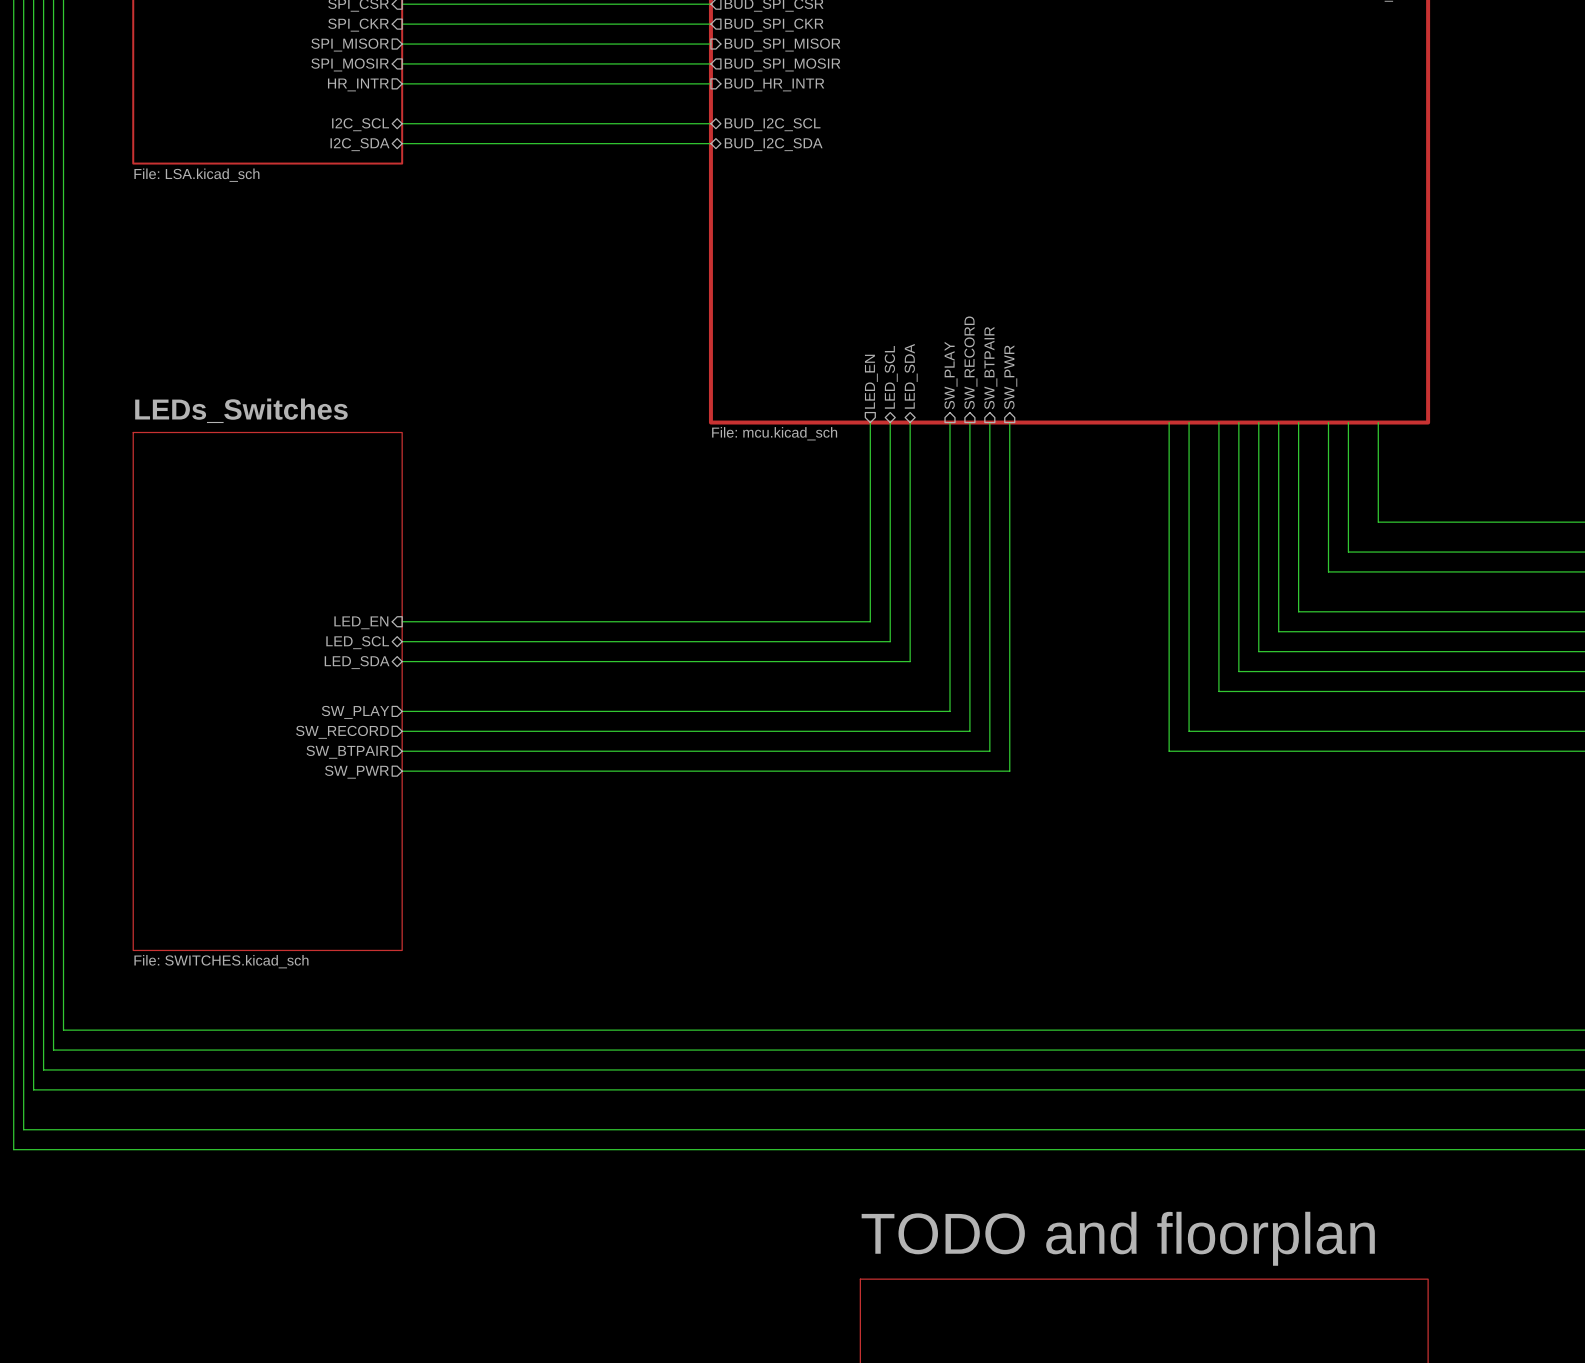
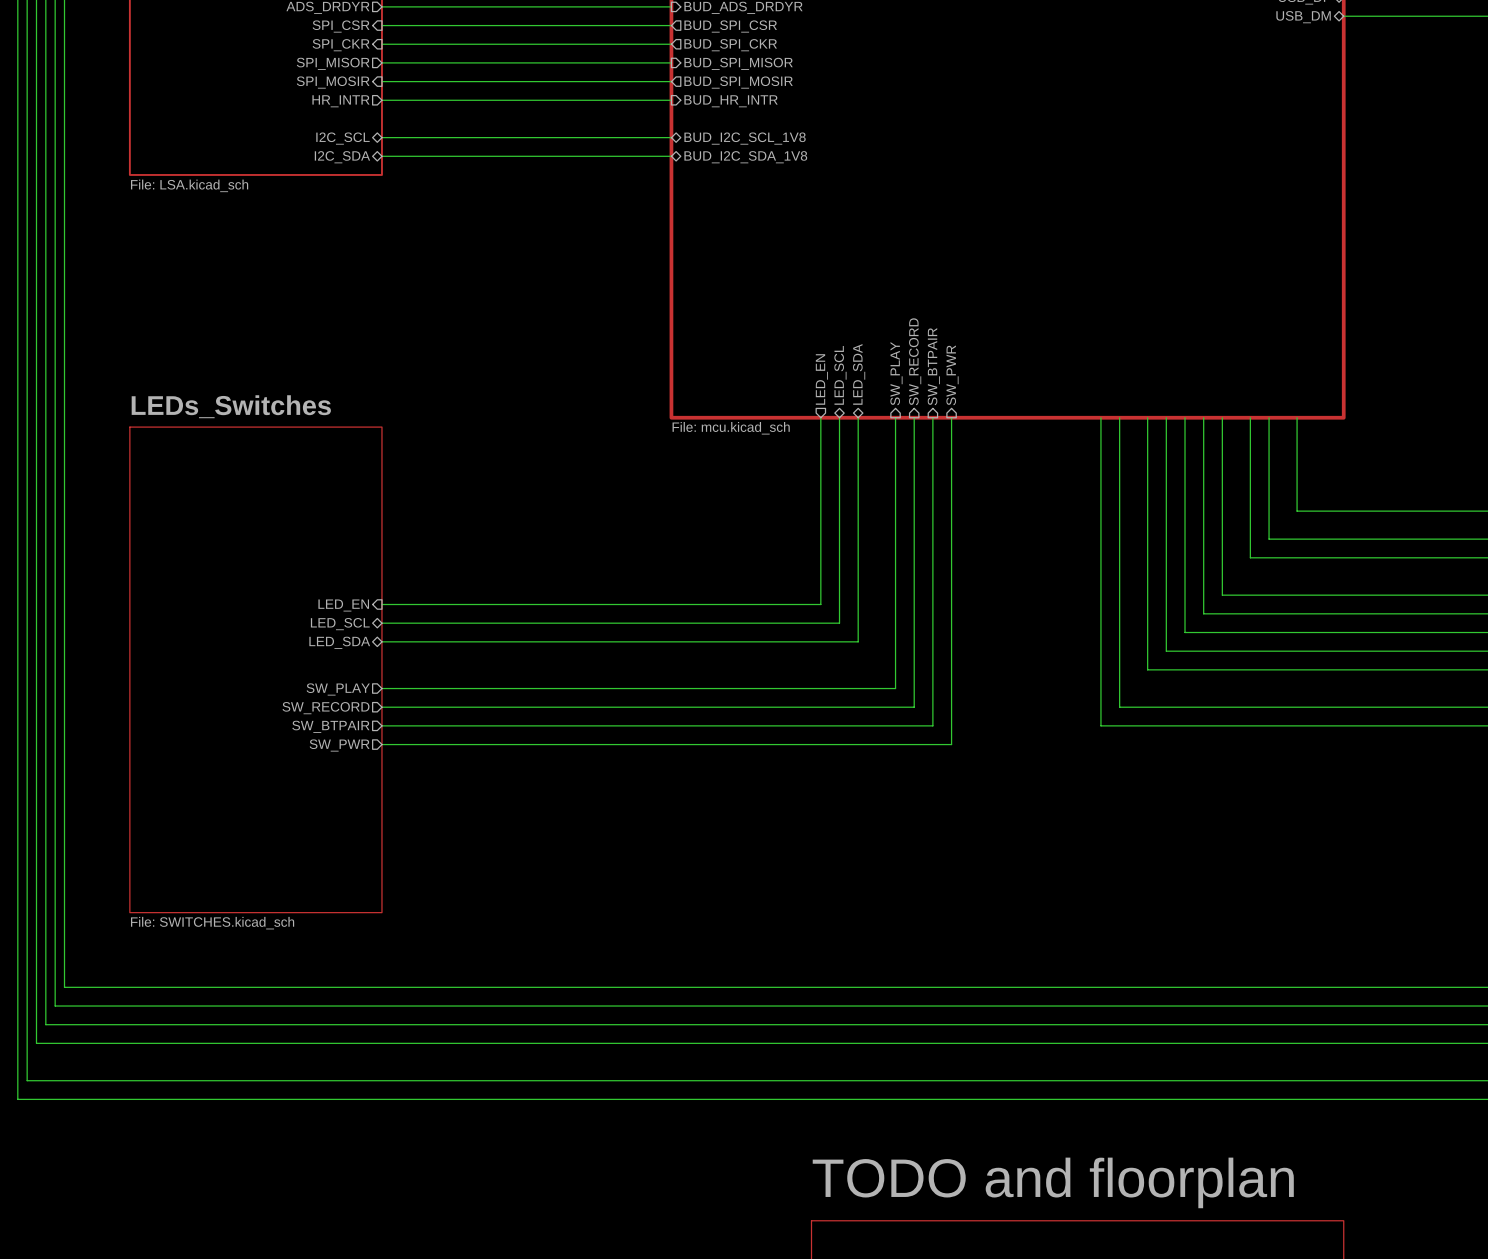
sheet pin: BUD_I2C_SCL (772, 124) -> BUD_I2C_SCL_1V8 (745, 138)
sheet pin: BUD_I2C_SDA (773, 144) -> BUD_I2C_SDA_1V8 (745, 157)

